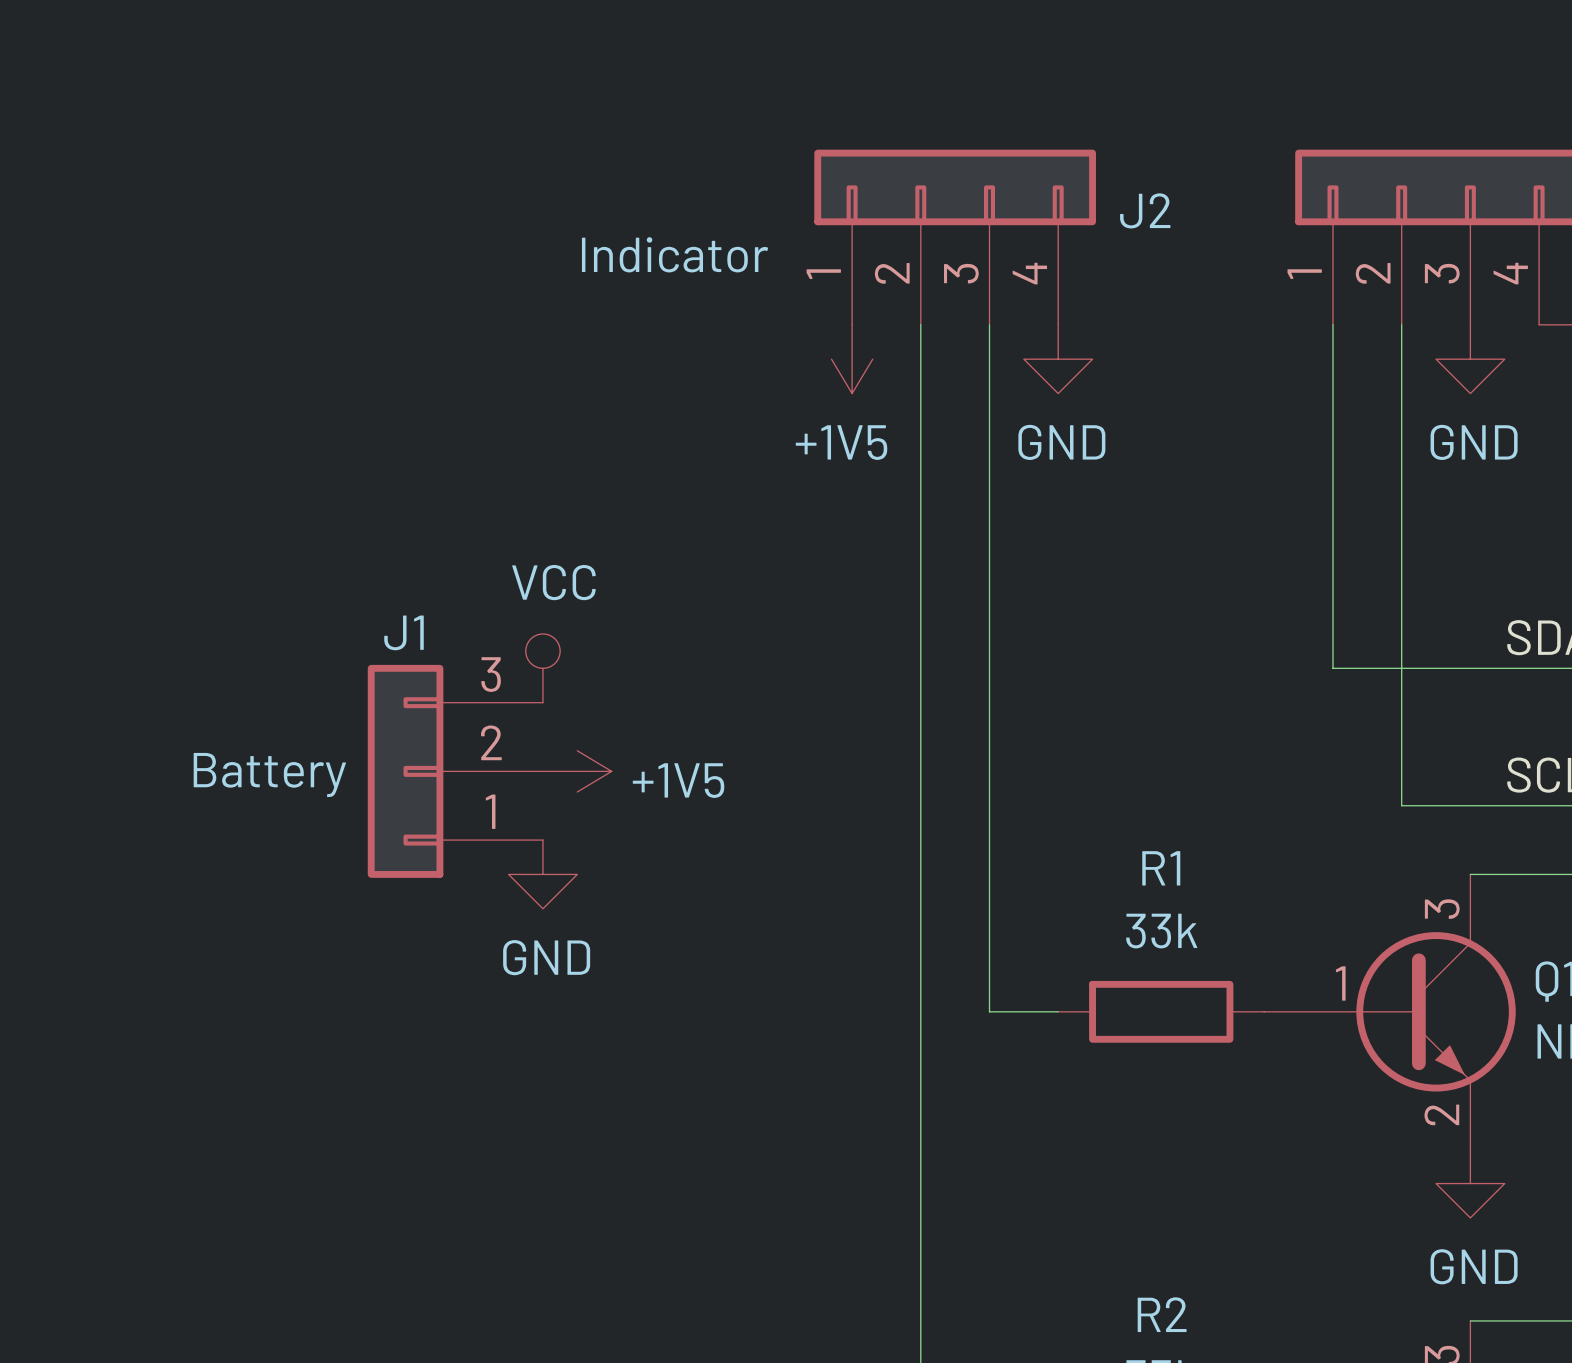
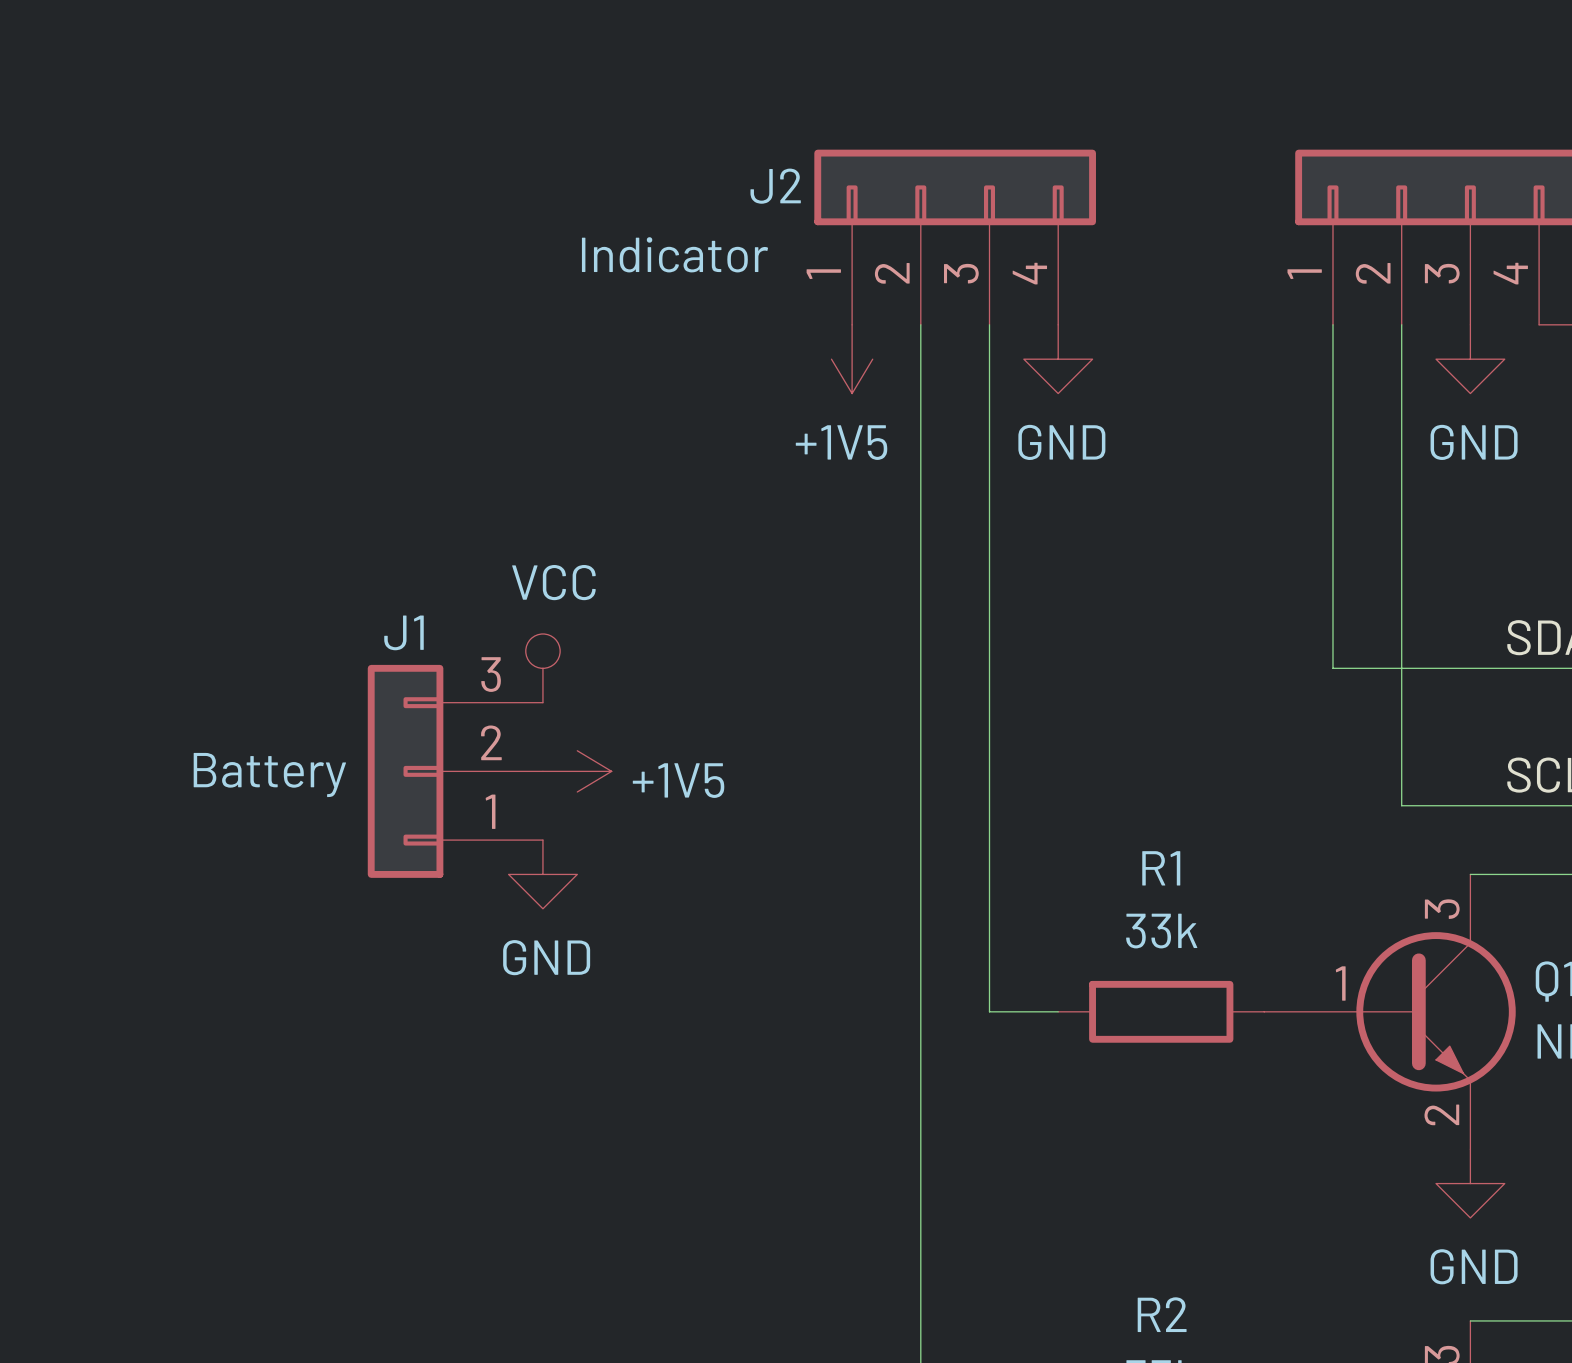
J2 name position: J2 (1145, 210) -> J2 (775, 186)

